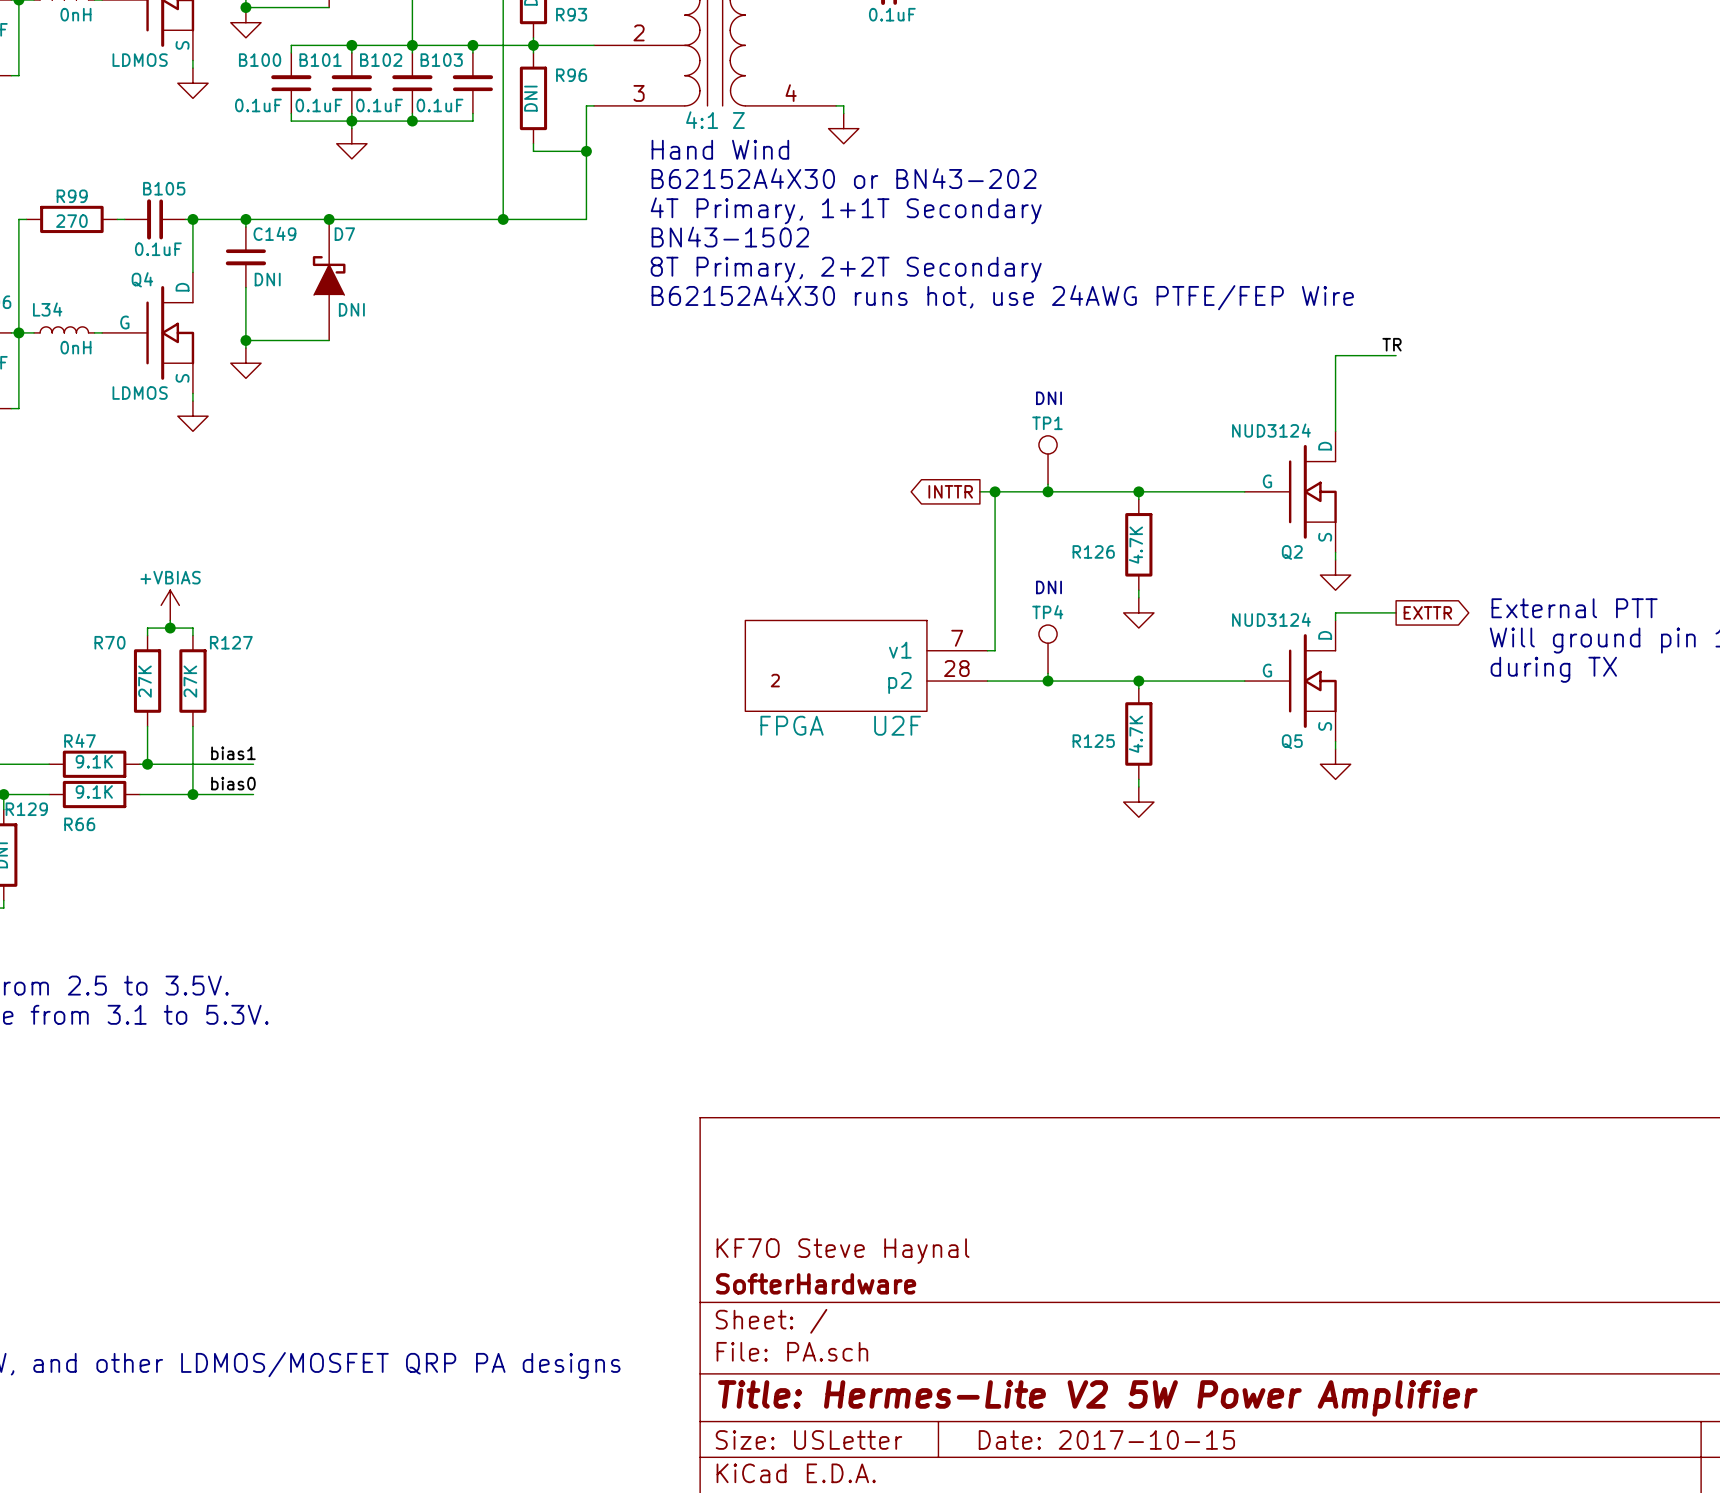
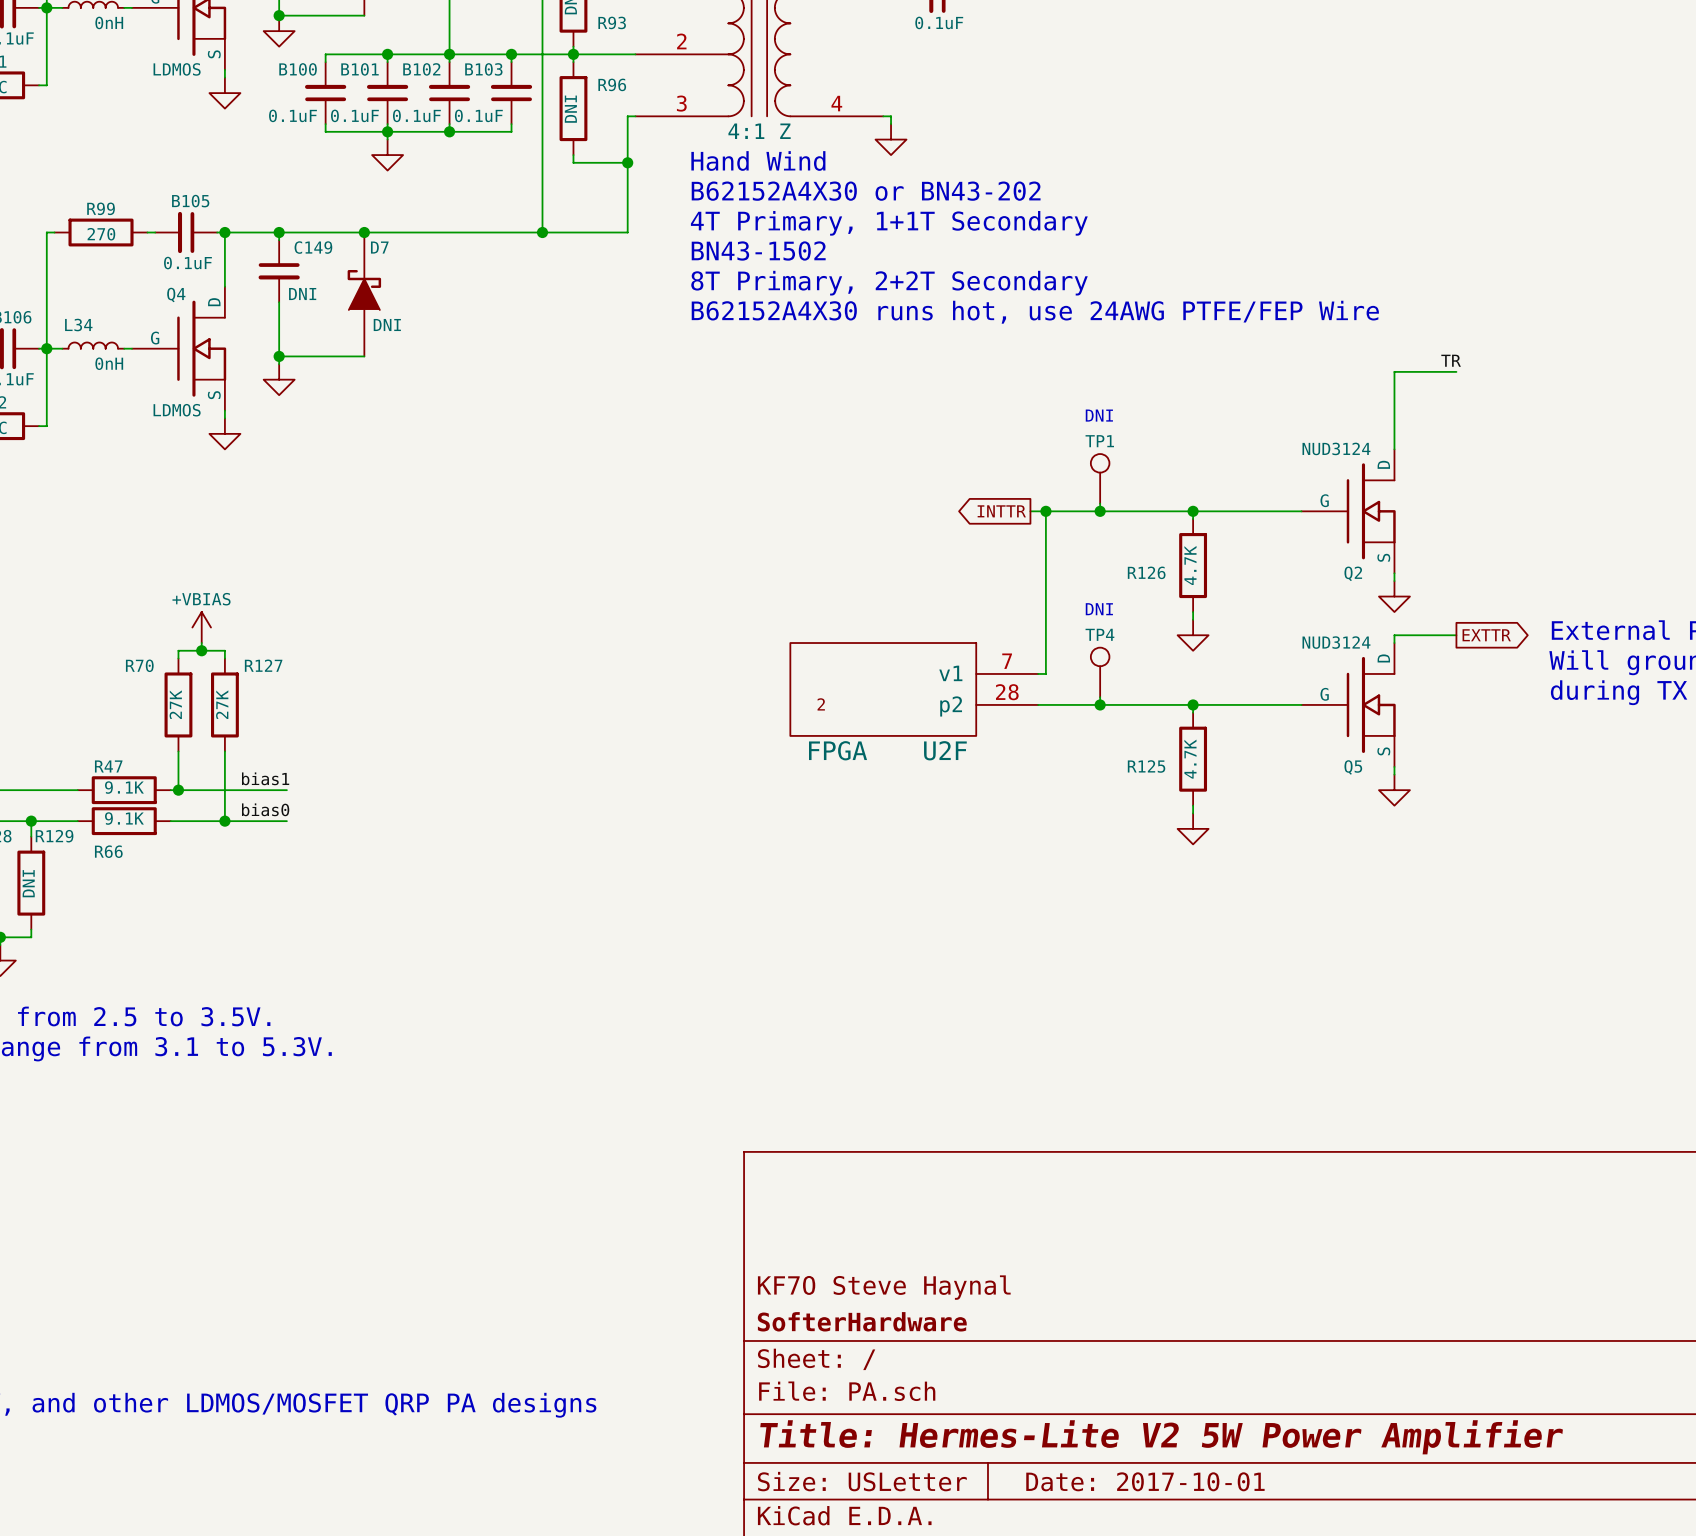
title block: Date: 2017-10-15 (1106, 1439) -> Date: 2017-10-01 (1145, 1481)

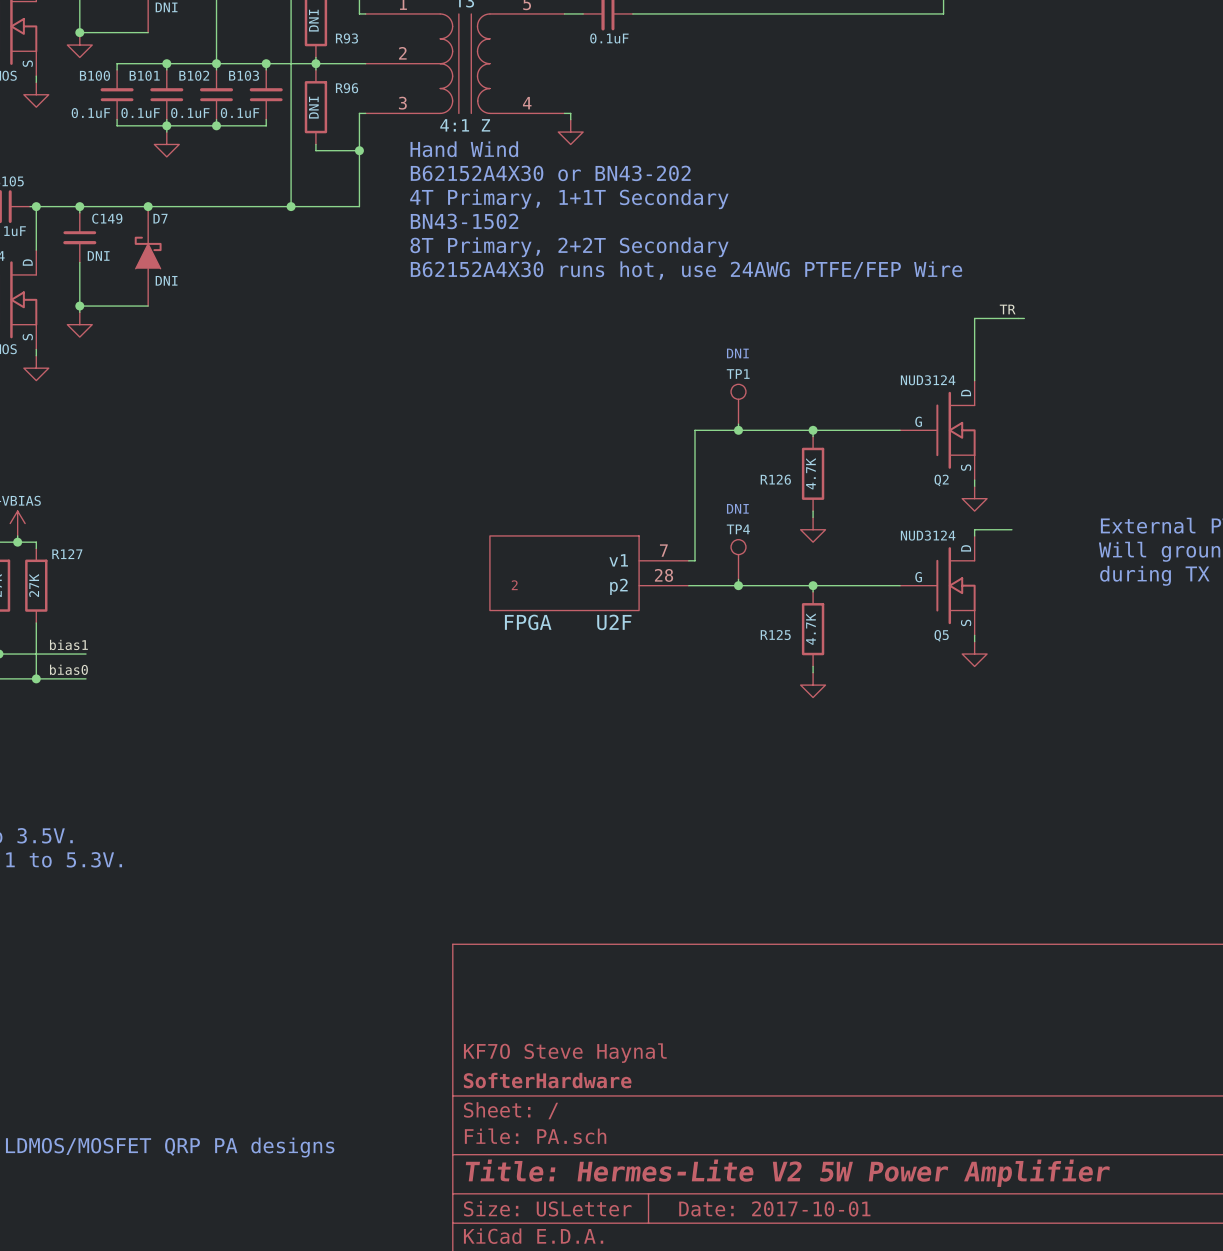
label position: TR (1451, 360) -> TR (1007, 309)
global label: INTTR (1001, 511) -> none
wire: (1030, 511) (1045, 511) -> none
junction: (1045, 511) -> none
wire: (1440, 635) (1456, 635) -> none
global label: EXTTR (1486, 635) -> none

